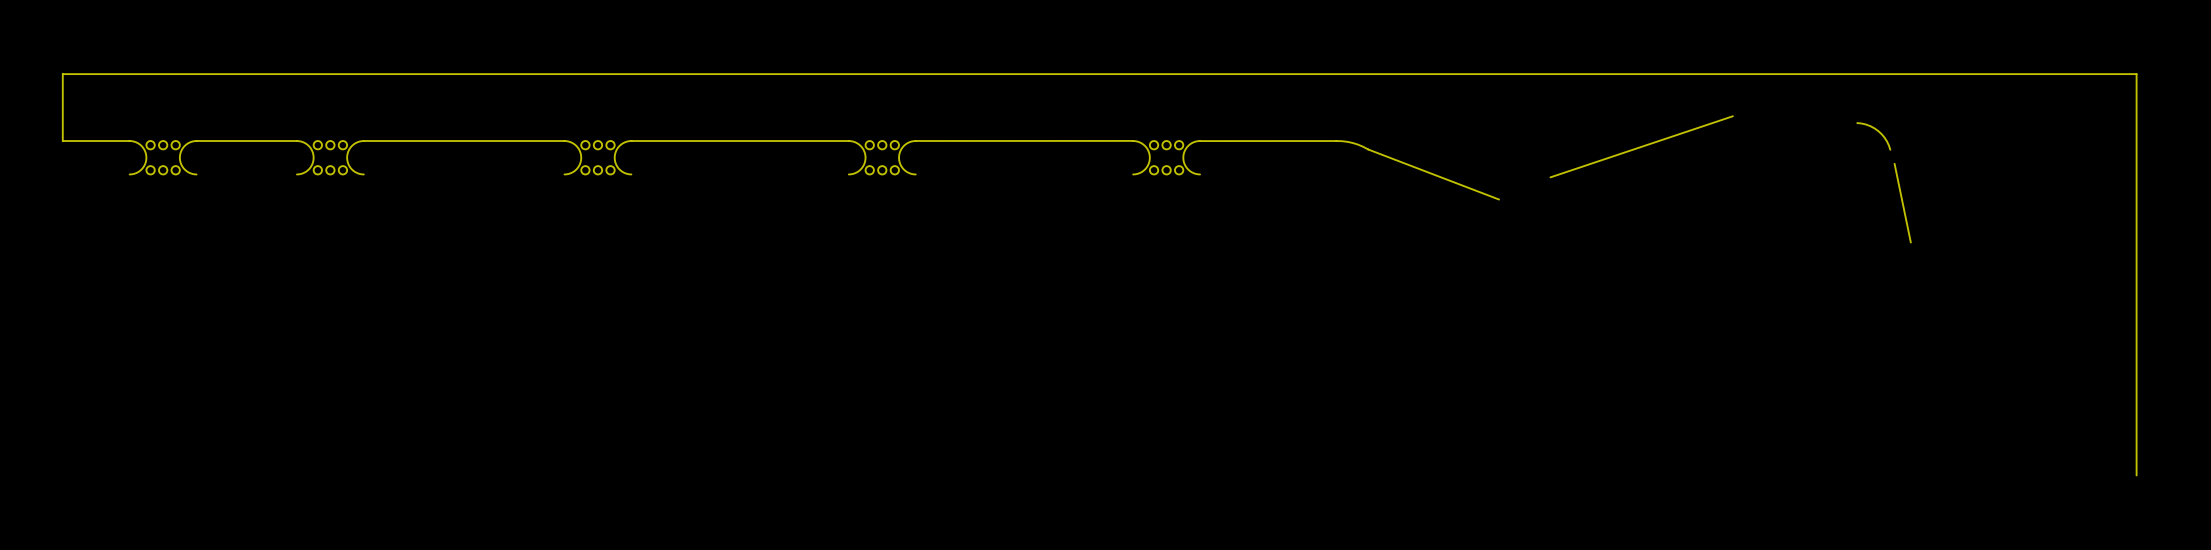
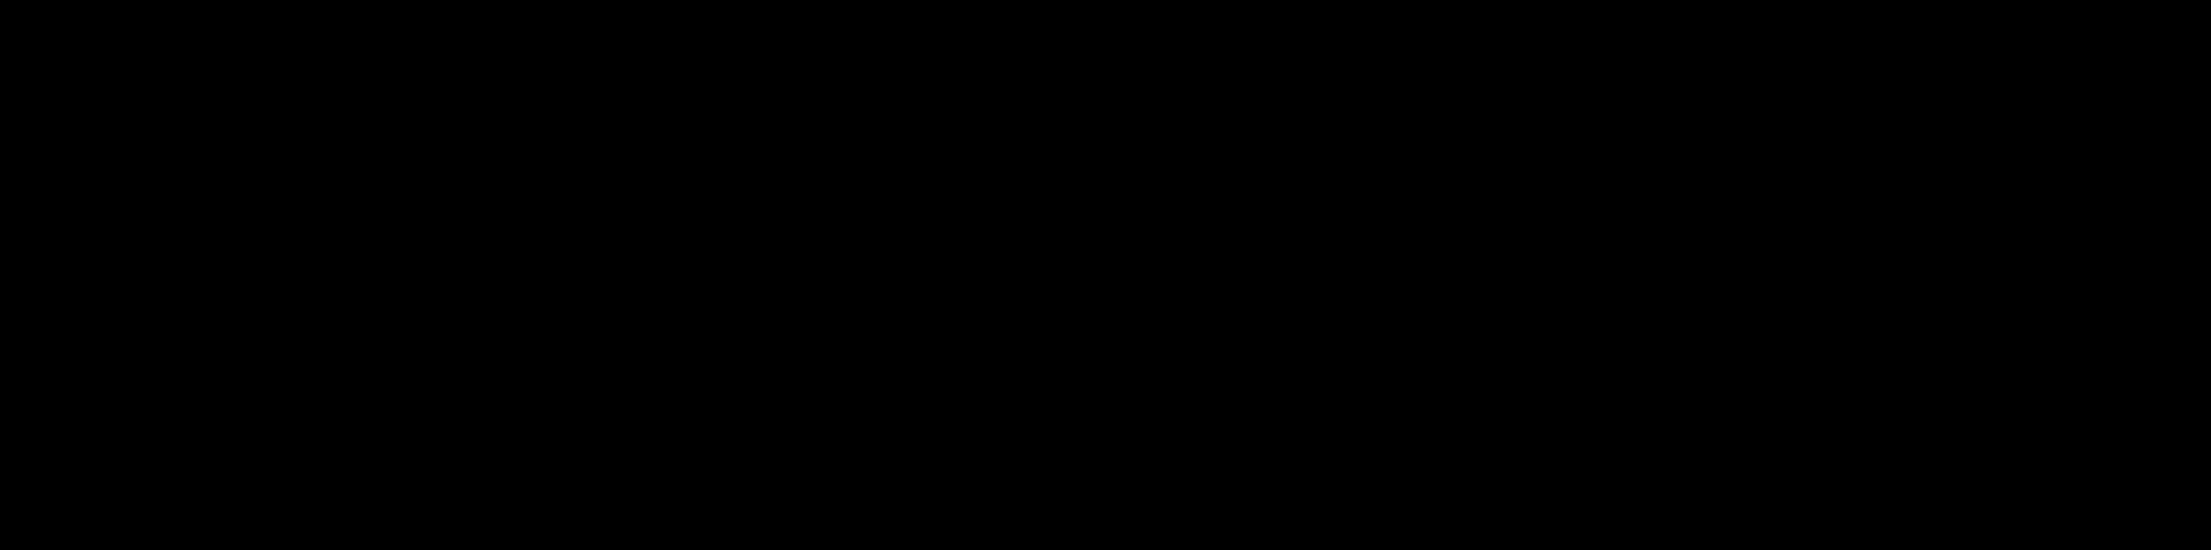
board edge: (1732, 116) (1550, 177) -> none
board edge: (1857, 123) (1866, 124) (1878, 130) (1884, 137) (1890, 149) -> none
part: (163, 157) -> none
part: (330, 157) -> none
part: (597, 157) -> none
part: (882, 157) -> none
part: (1166, 157) -> none
board edge: (1894, 163) (1910, 242) -> none
board edge: (129, 174) (139, 171) (145, 162) (145, 151) (138, 143) (129, 141) (62, 141) (62, 74) (2136, 74) (2136, 475) -> none
board edge: (296, 174) (308, 169) (313, 157) (308, 145) (296, 141) (192, 141) (183, 147) (180, 159) (186, 171) (196, 174) -> none
board edge: (564, 174) (576, 169) (581, 157) (576, 145) (564, 141) (361, 141) (350, 147) (347, 159) (353, 171) (363, 174) -> none
board edge: (848, 174) (860, 169) (865, 157) (860, 145) (848, 141) (629, 141) (618, 147) (614, 159) (621, 171) (631, 174) -> none
board edge: (1133, 174) (1144, 169) (1149, 157) (1144, 145) (1133, 141) (913, 141) (902, 147) (899, 159) (905, 171) (915, 174) -> none
board edge: (1200, 174) (1189, 171) (1183, 159) (1186, 147) (1195, 141) (1341, 141) (1358, 144) (1499, 199) -> none

